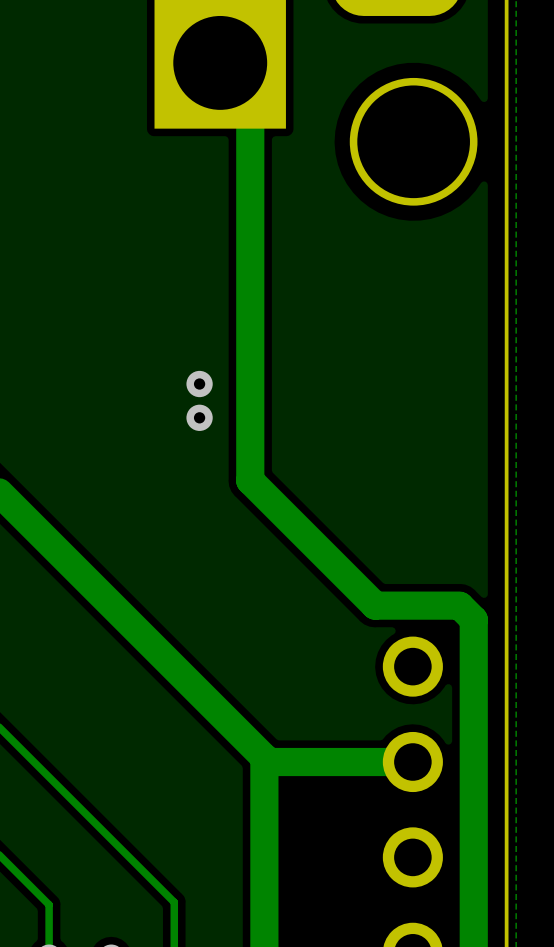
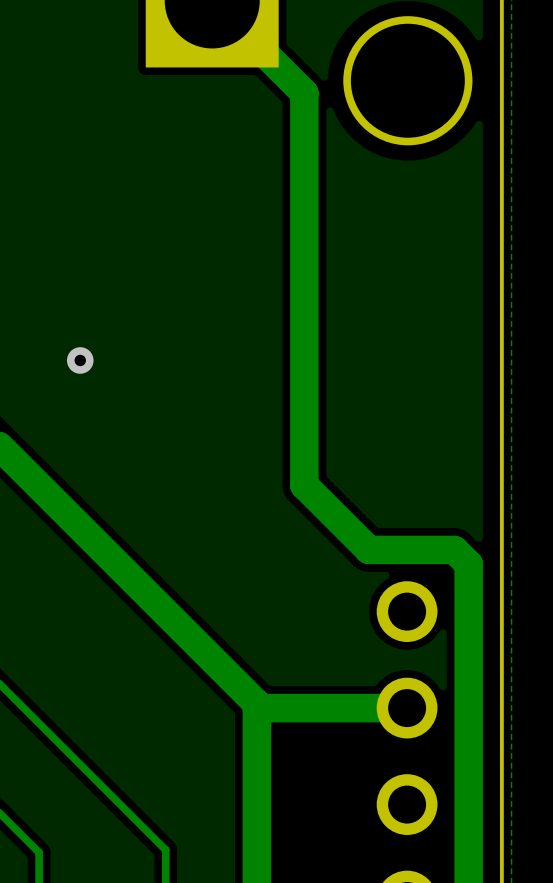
track: (250, 92) (250, 480) (311, 541) -> (242, 31) (304, 93) (304, 485)
via: (199, 384) -> none
via: (199, 417) -> none
via: none -> (80, 360)

